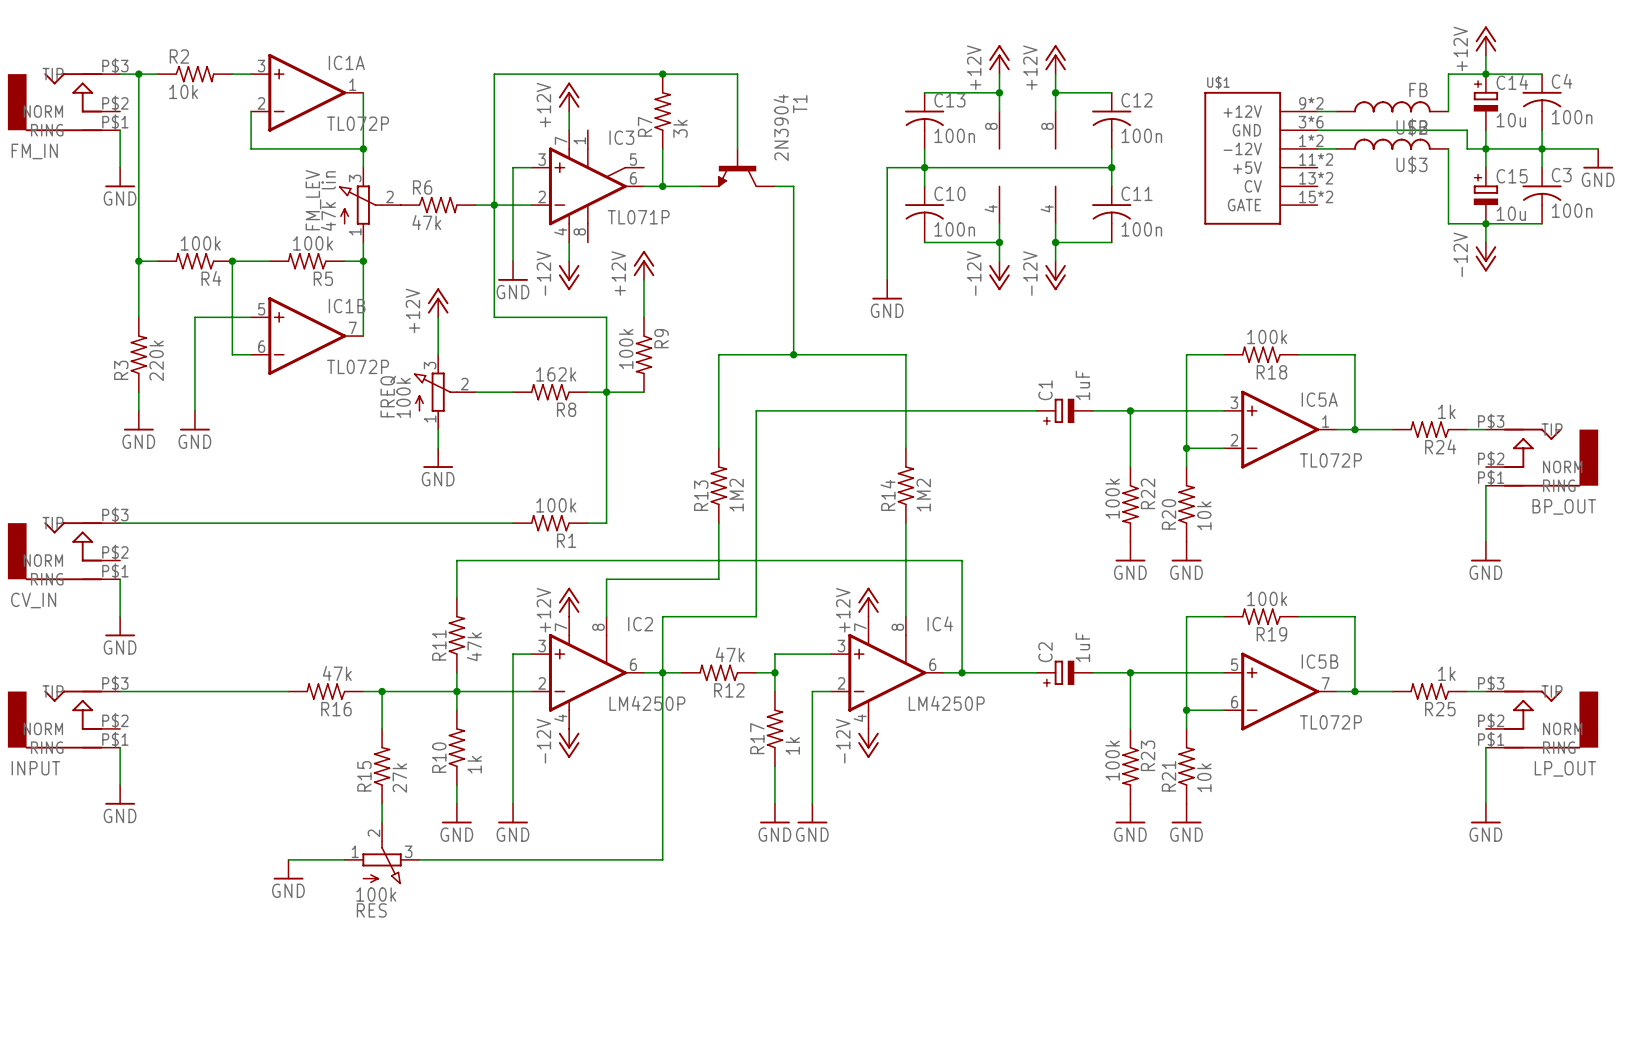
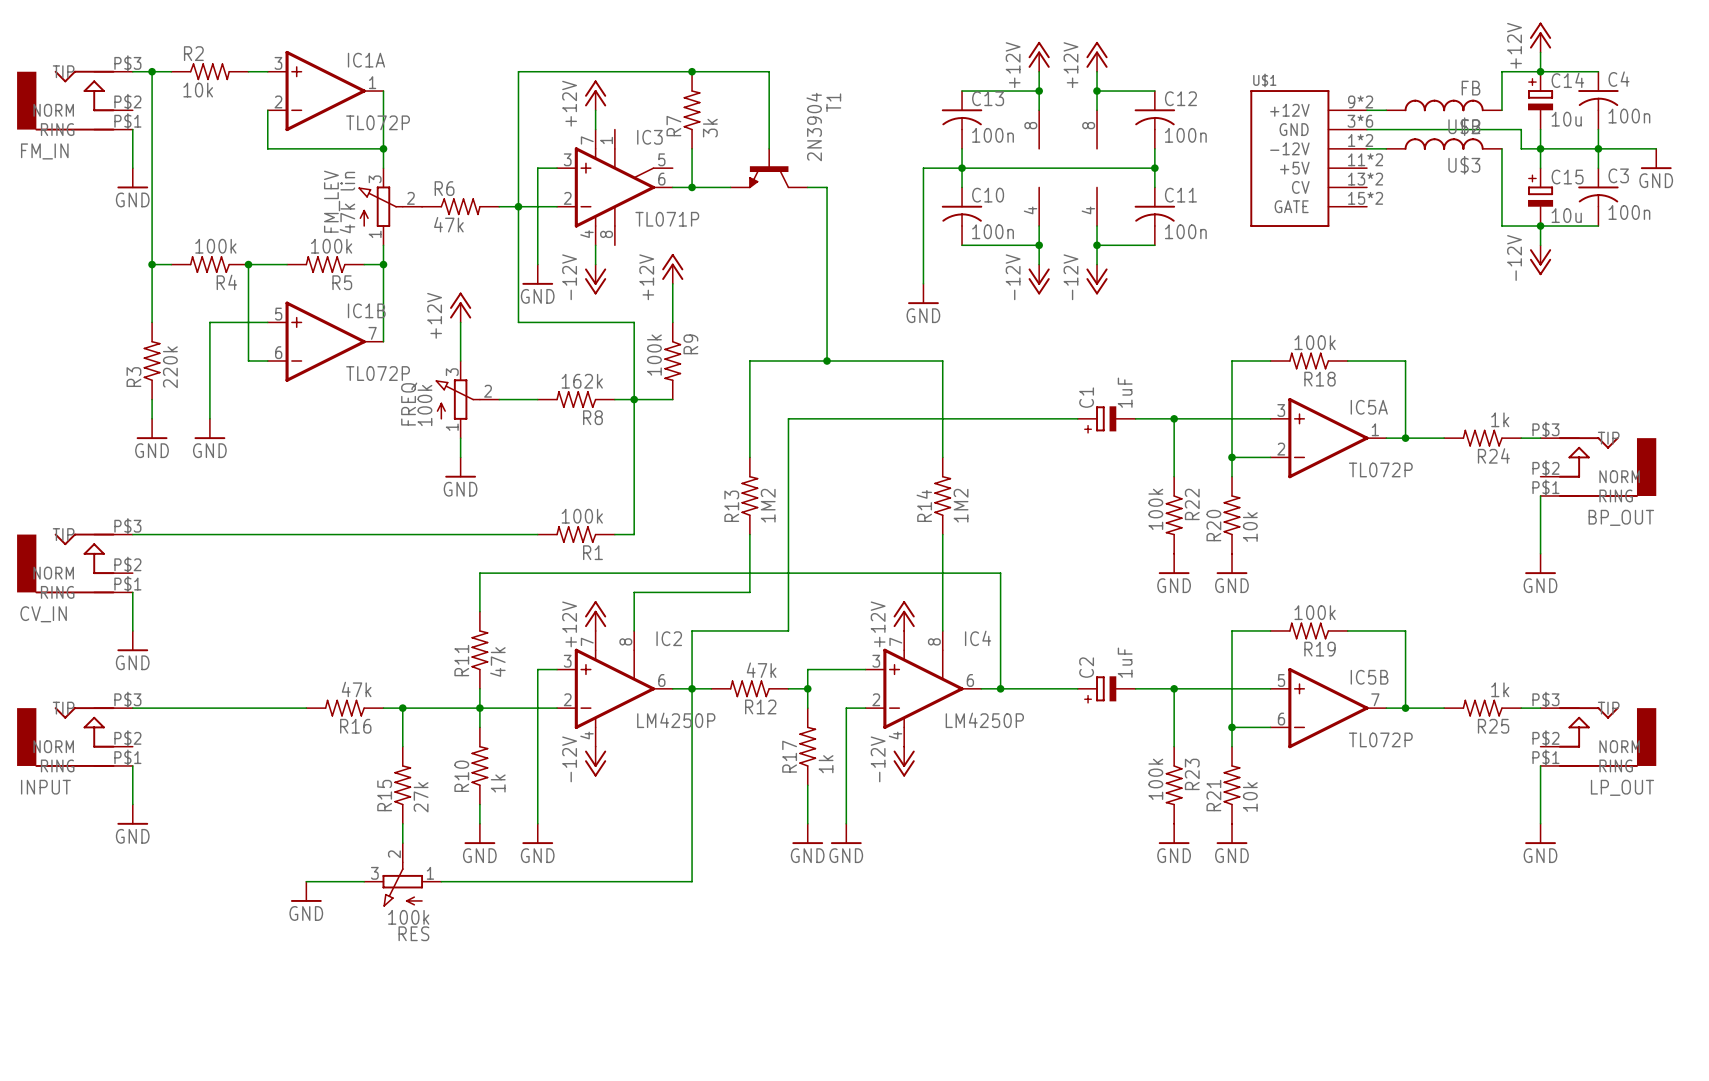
RES flip: as is (382, 862) -> left-right (402, 884)

